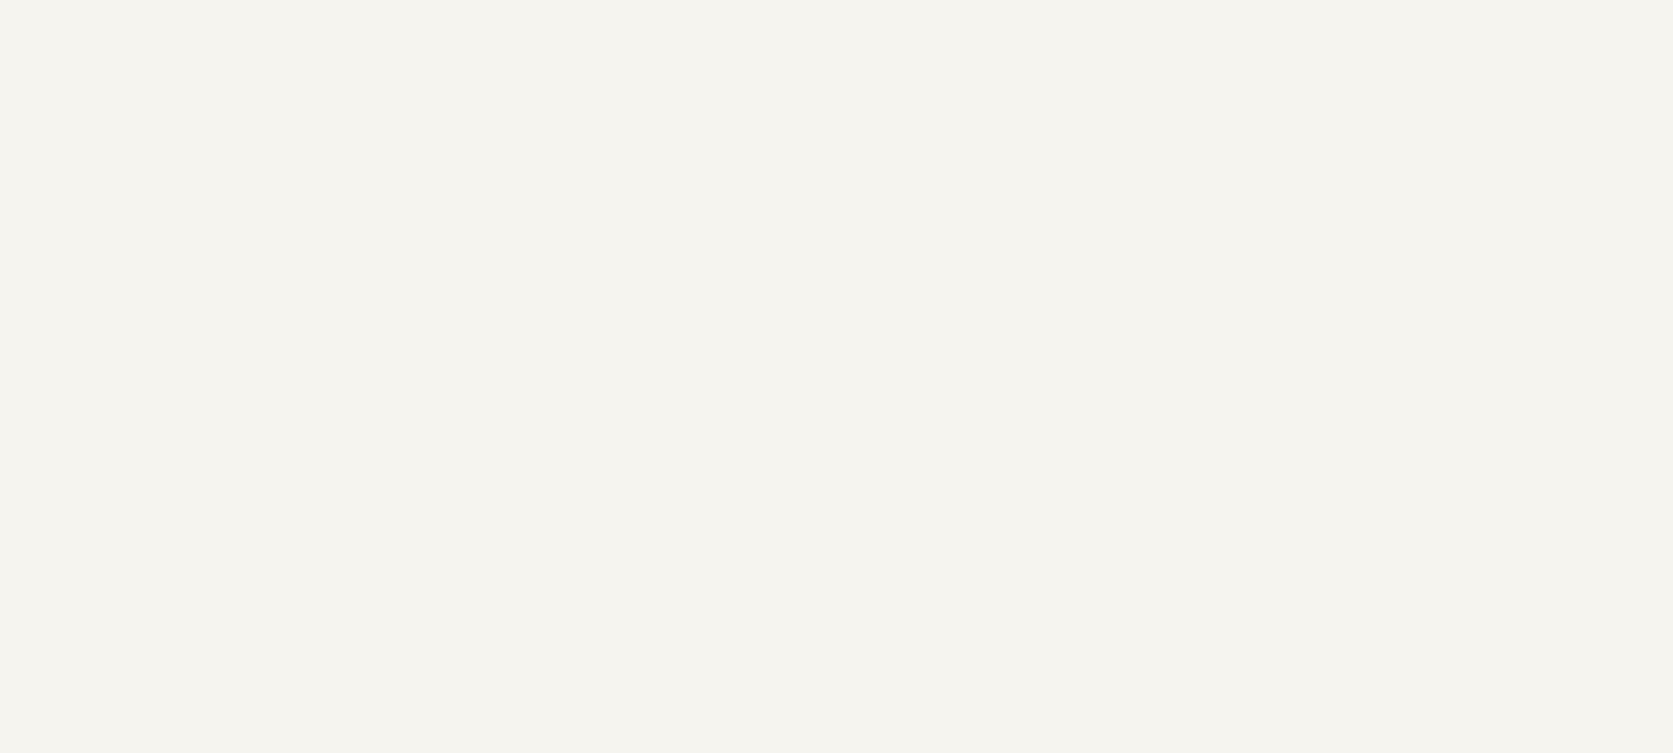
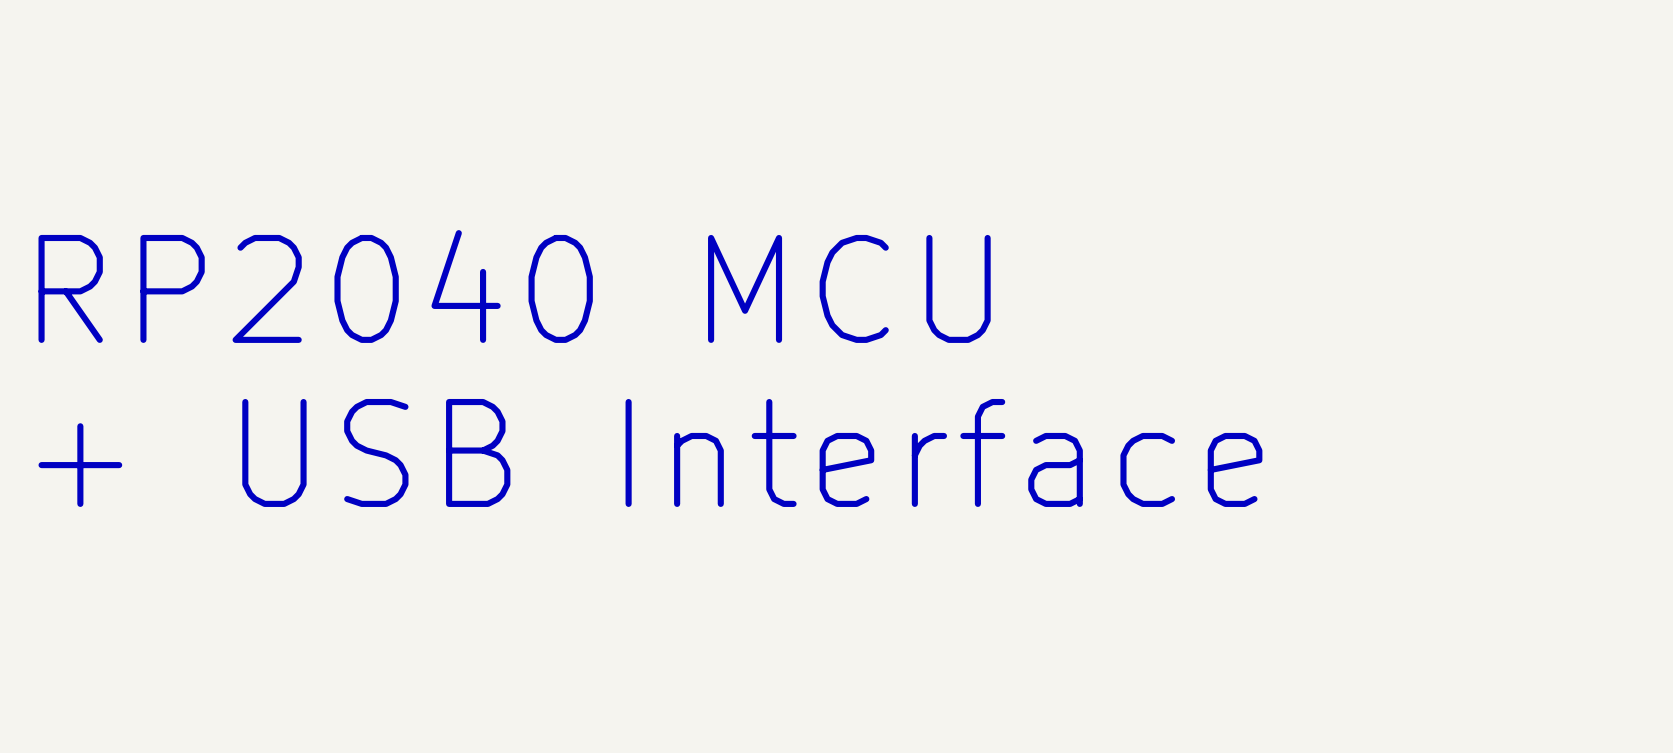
text: none -> RP2040 MCU (514, 286)
text: none -> + USB Interface (650, 452)

